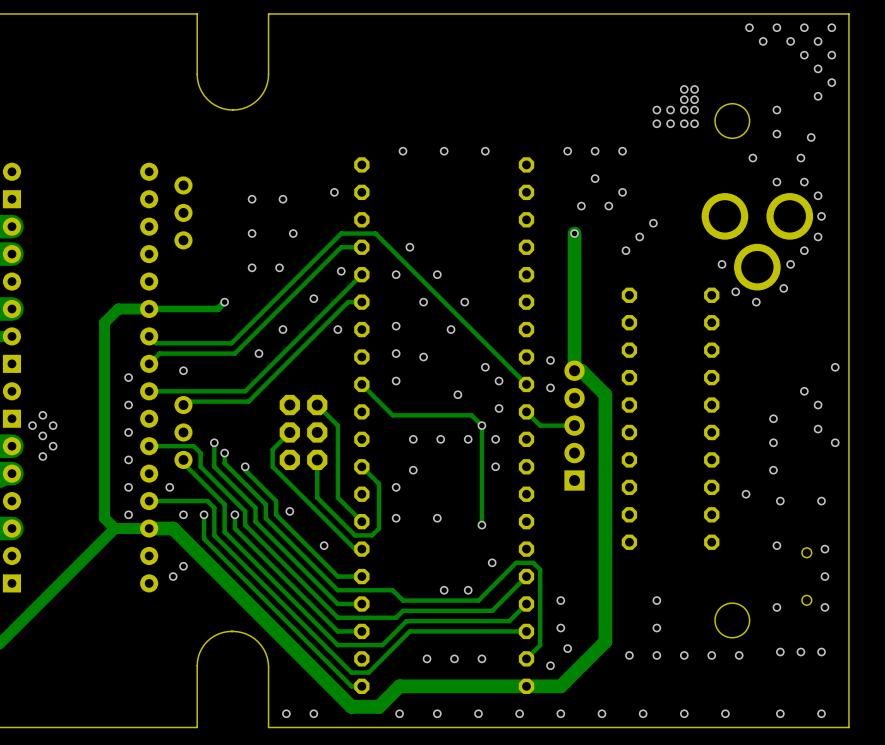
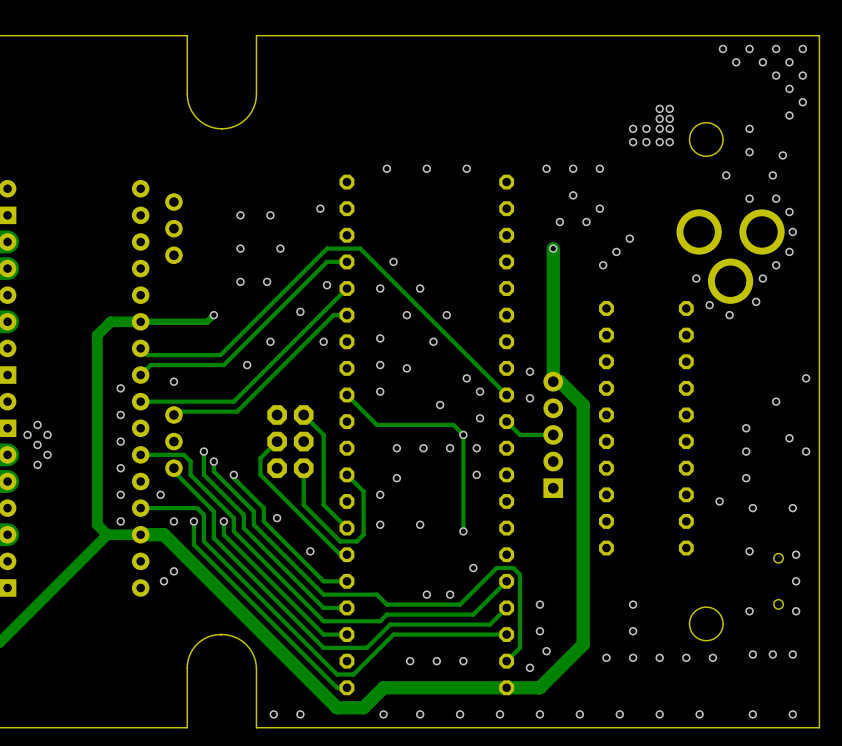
via: (818, 405) -> none

